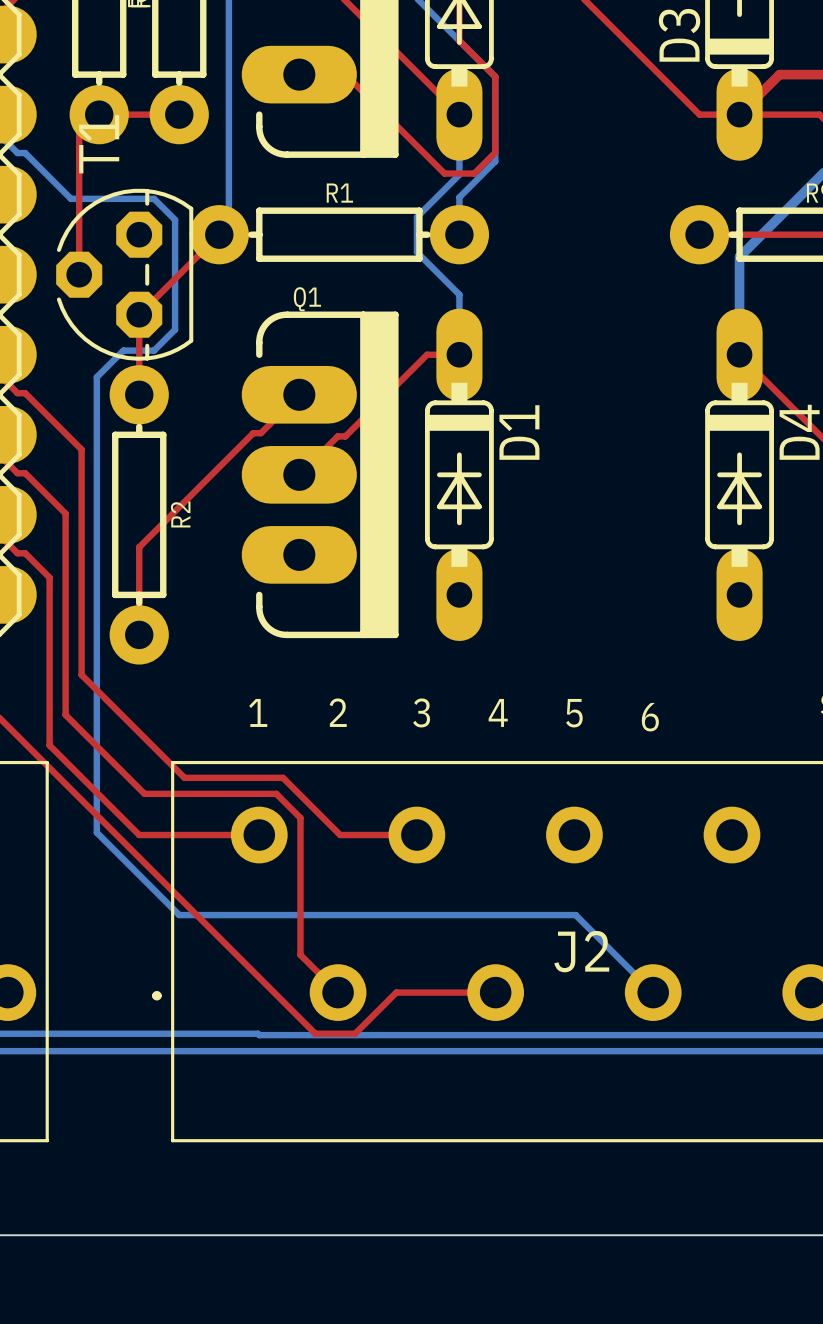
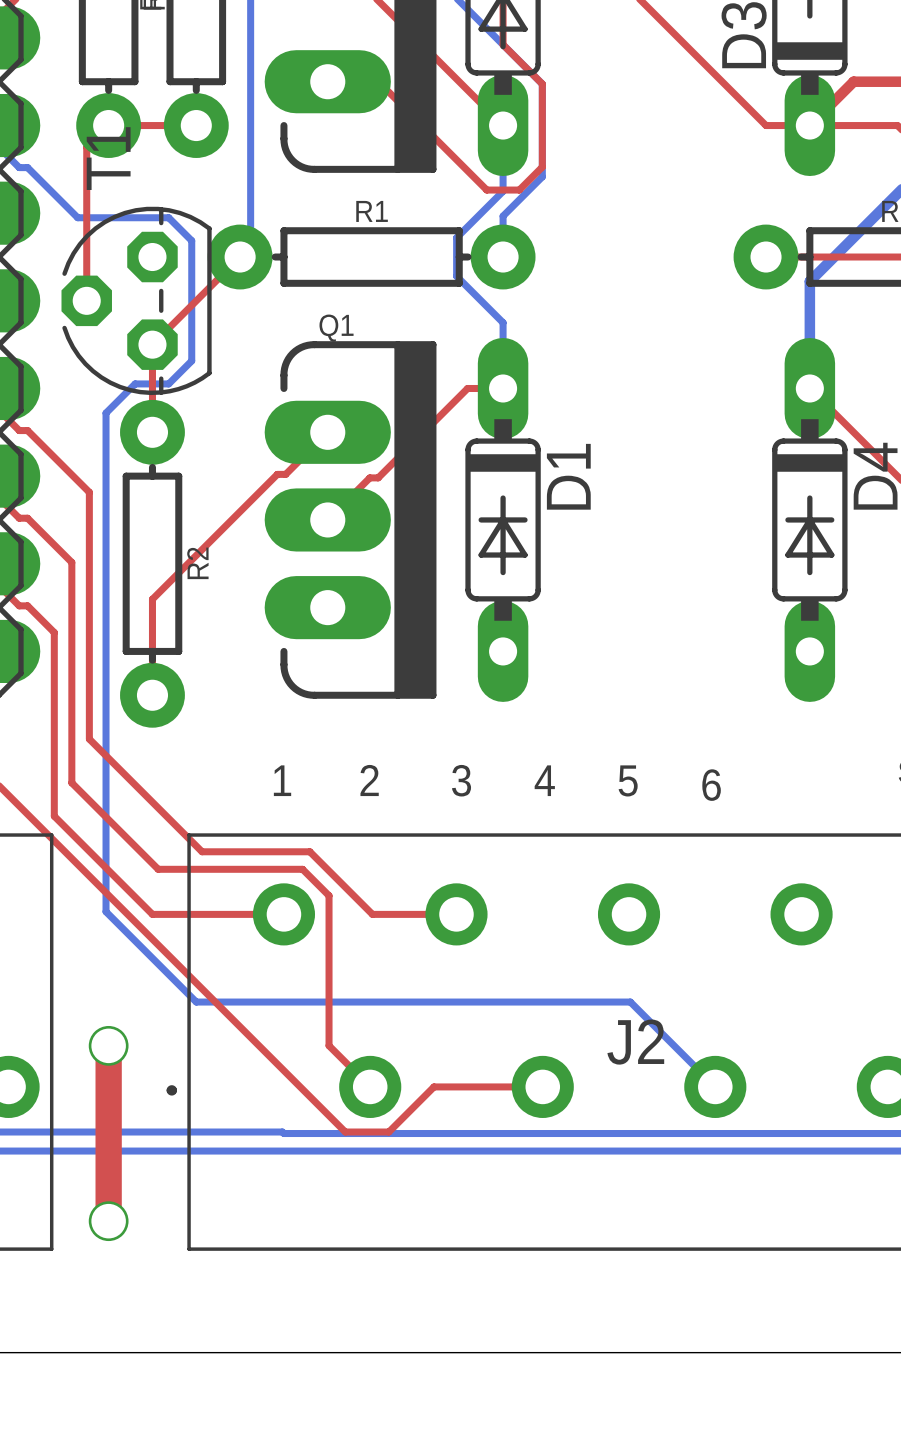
top track: none -> (108, 1045) (108, 1221)
via: none -> (108, 1045)
via: none -> (108, 1221)

